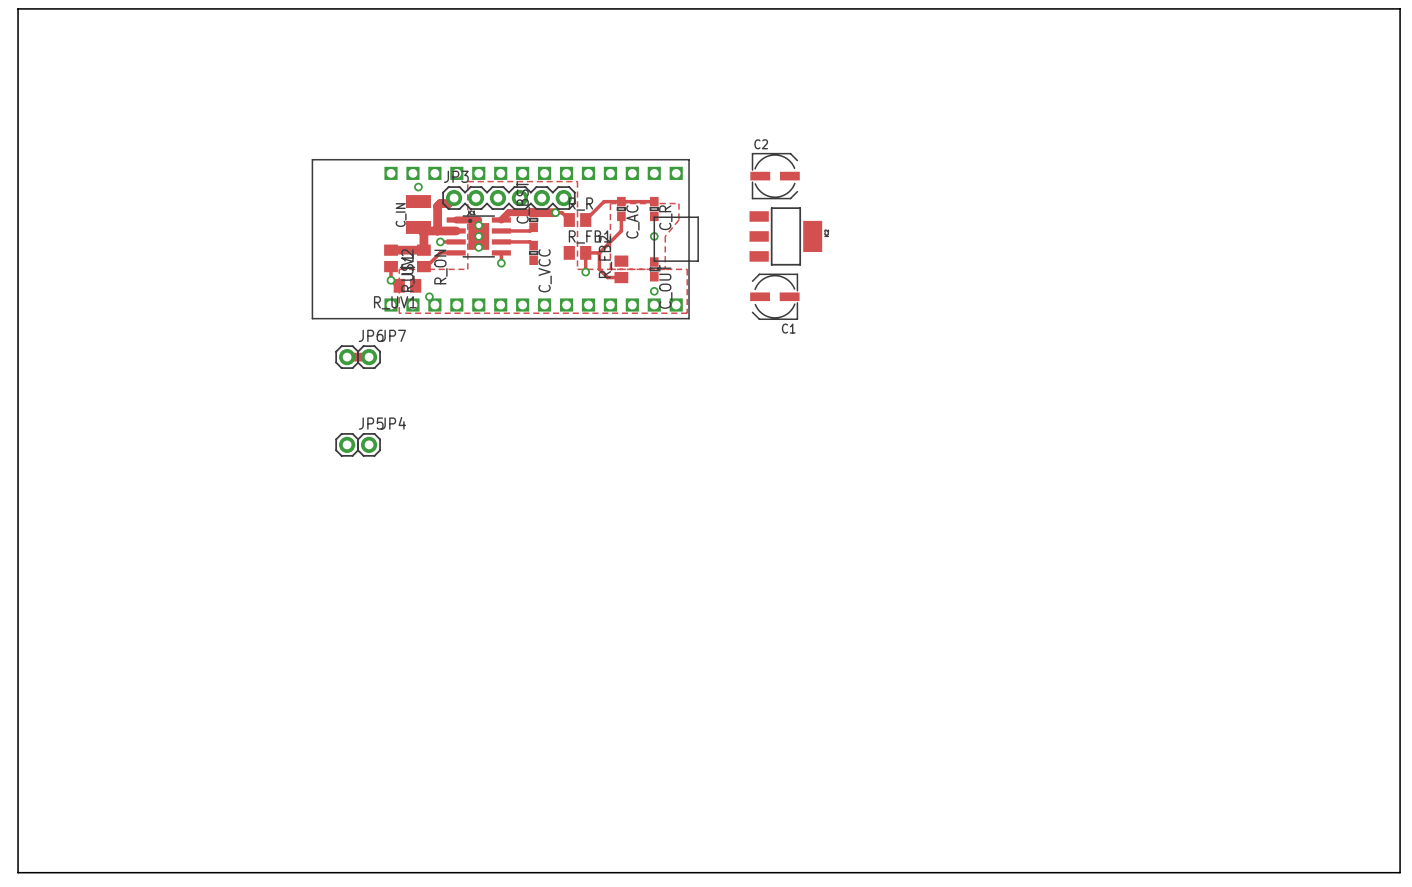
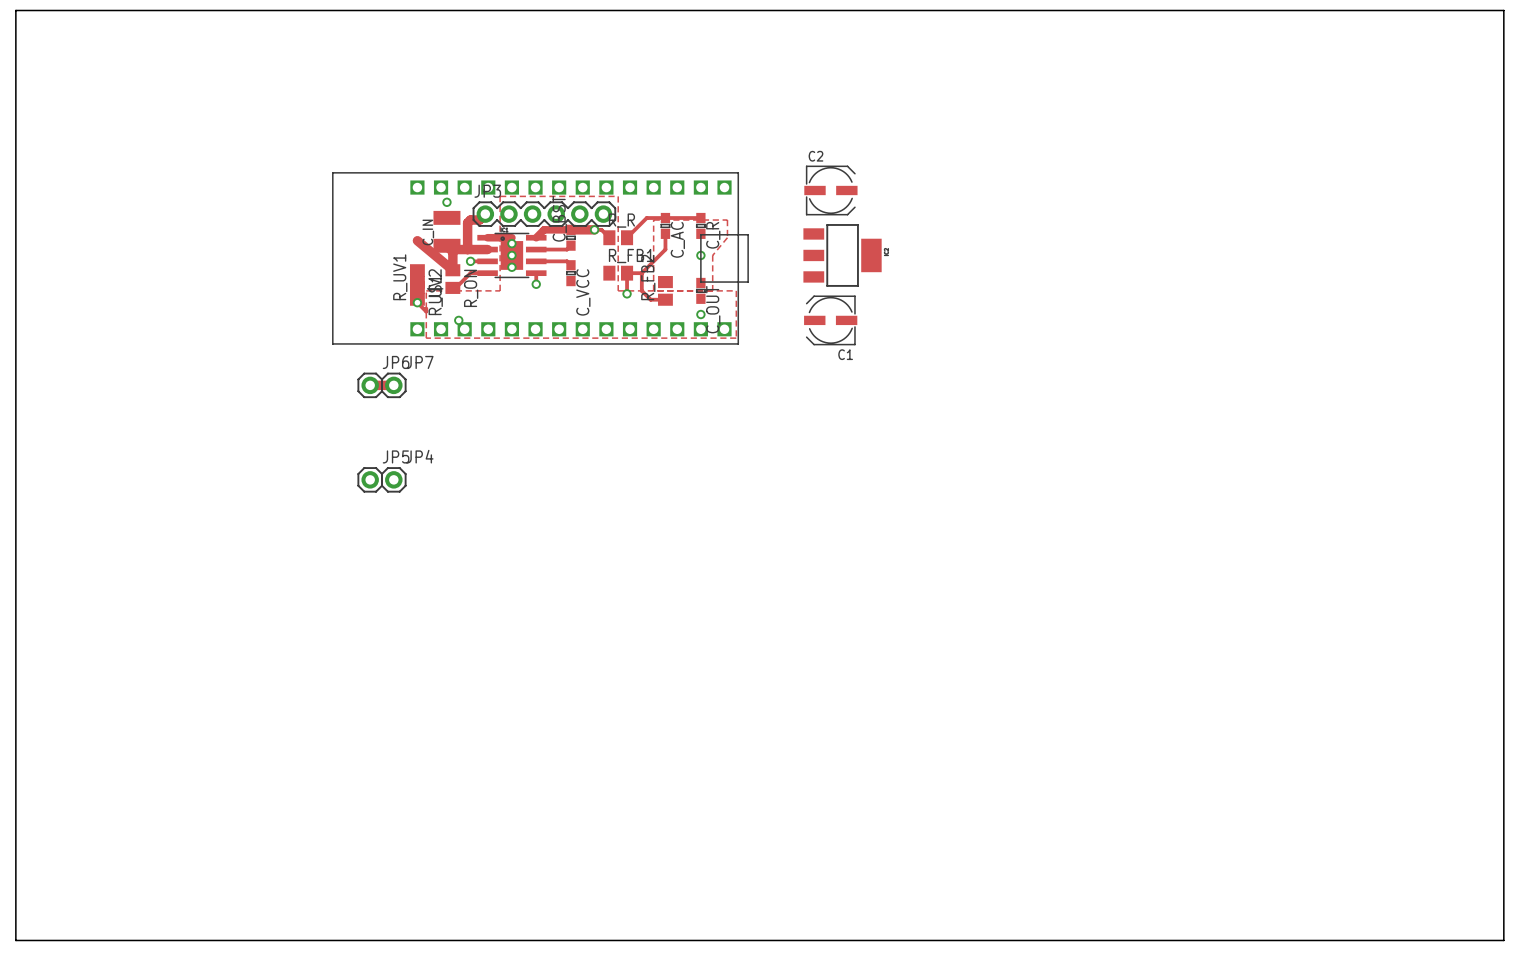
track: (391, 250) (423, 250) -> (417, 240) (452, 270)
R_UV1 rotation: 0° (407, 285) -> 90° clockwise (417, 290)
R_UV1 position: (407, 285) -> (417, 290)

